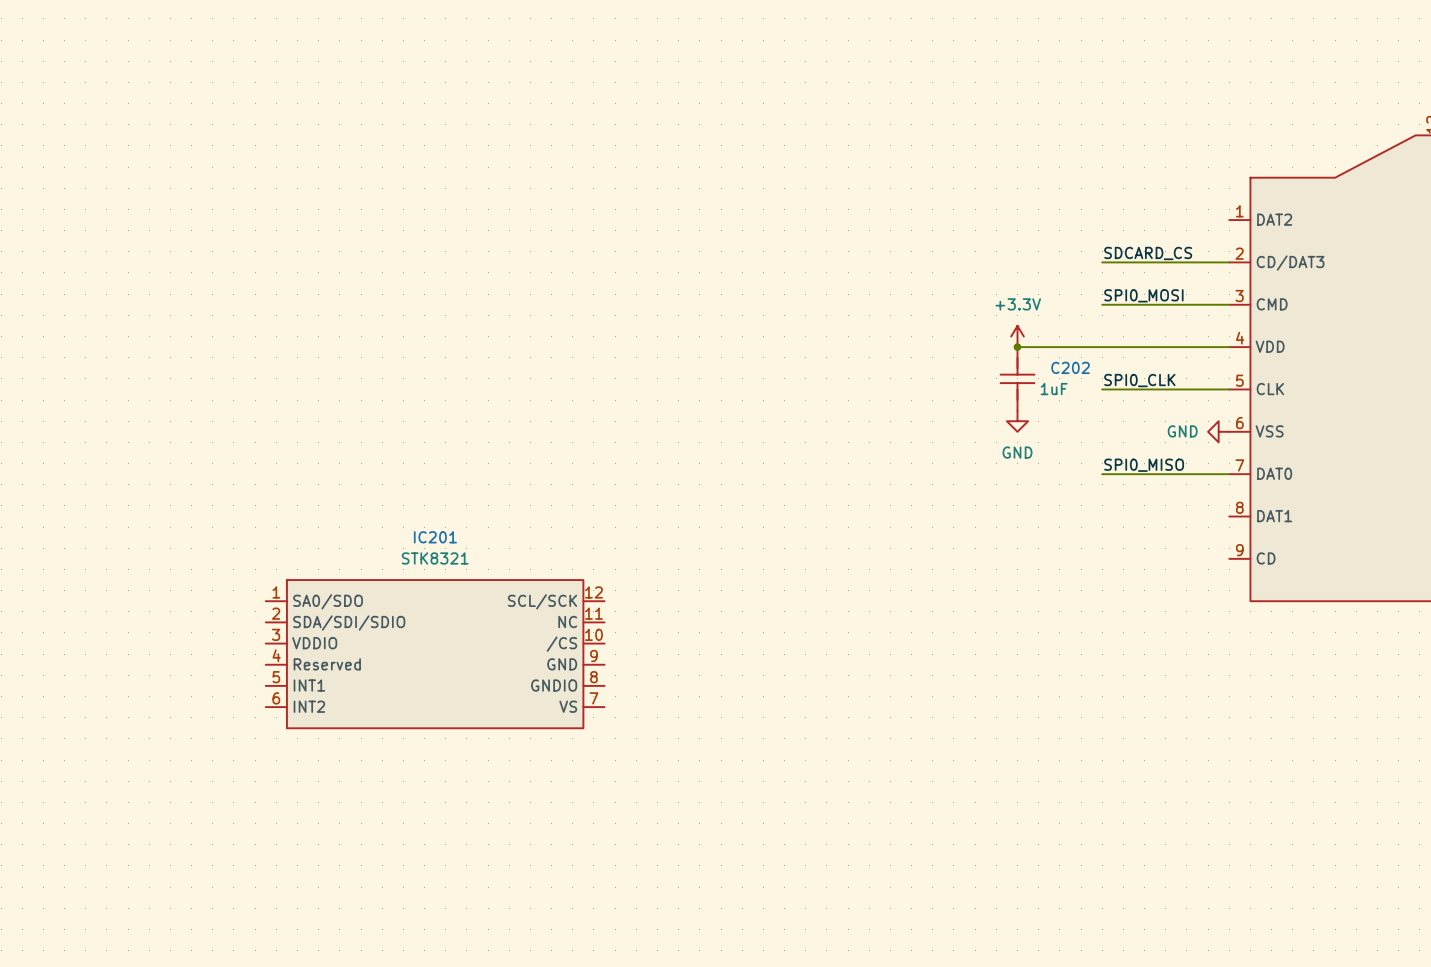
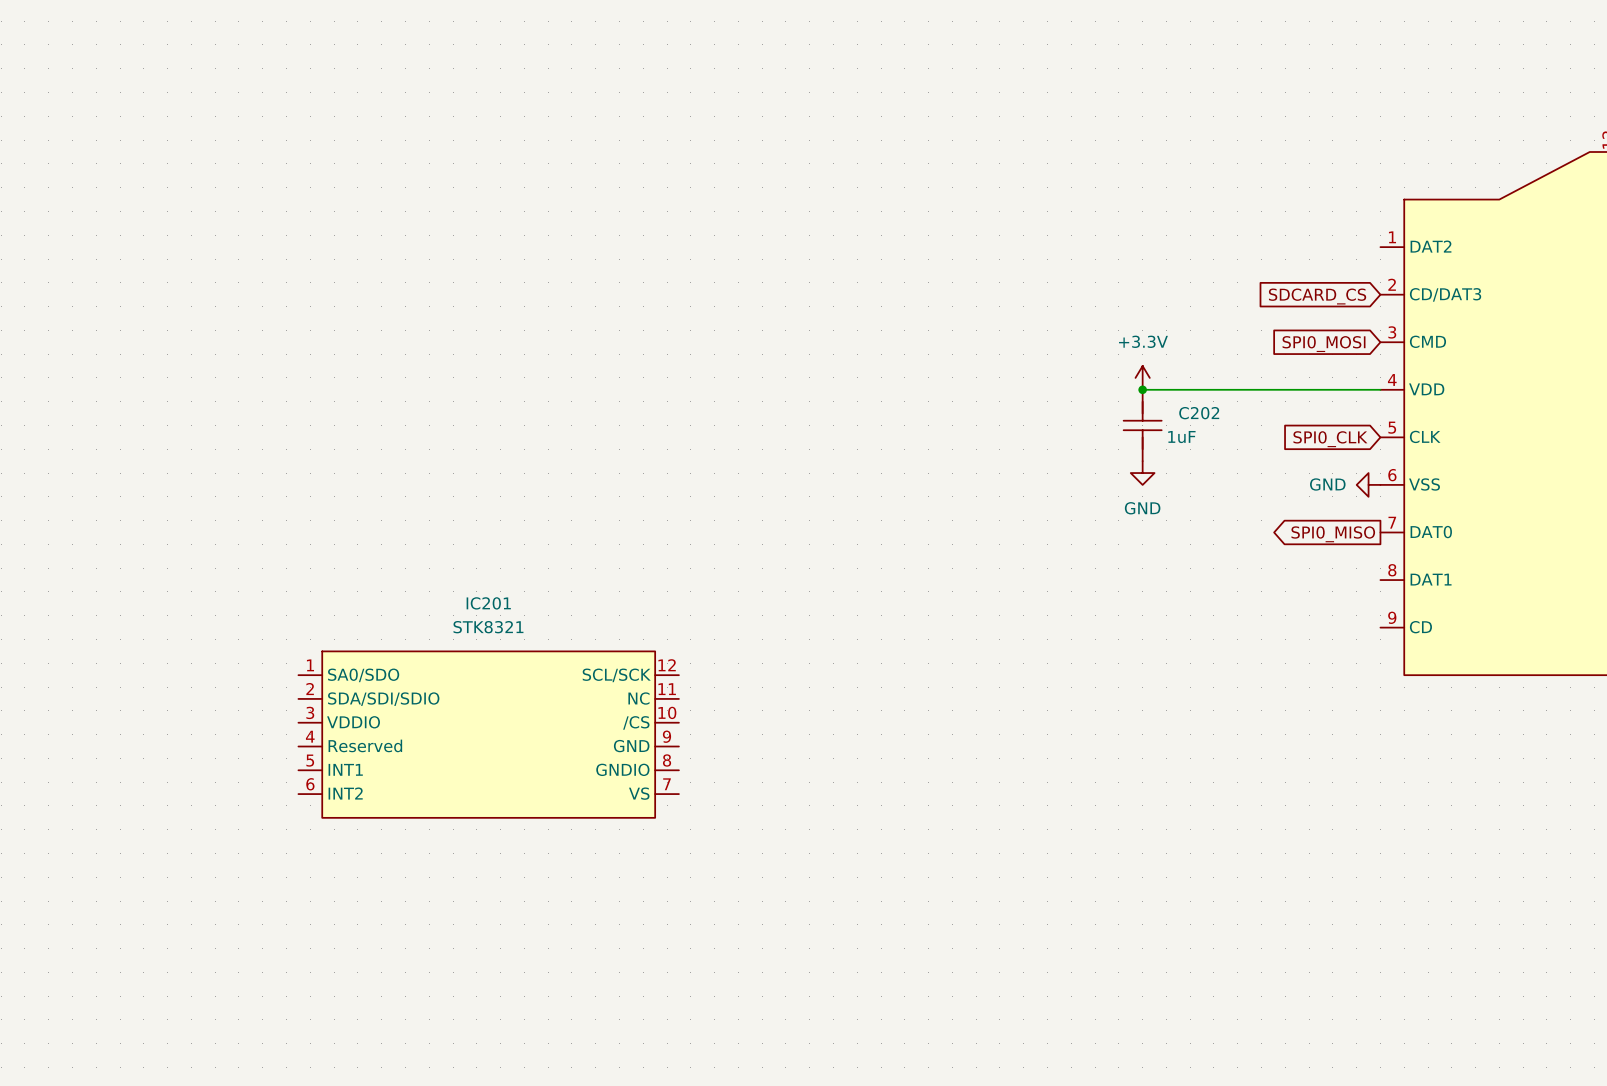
label: SDCARD_CS (1148, 253) -> none
wire: (1102, 262) (1229, 262) -> none
global label: none -> SDCARD_CS (1317, 296)
label: SPI0_MOSI (1143, 295) -> none
wire: (1102, 304) (1229, 304) -> none
global label: none -> SPI0_MOSI (1324, 344)
label: SPI0_CLK (1139, 380) -> none
wire: (1102, 389) (1229, 389) -> none
global label: none -> SPI0_CLK (1330, 439)
label: SPI0_MISO (1144, 465) -> none
wire: (1102, 474) (1229, 474) -> none
global label: none -> SPI0_MISO (1333, 534)

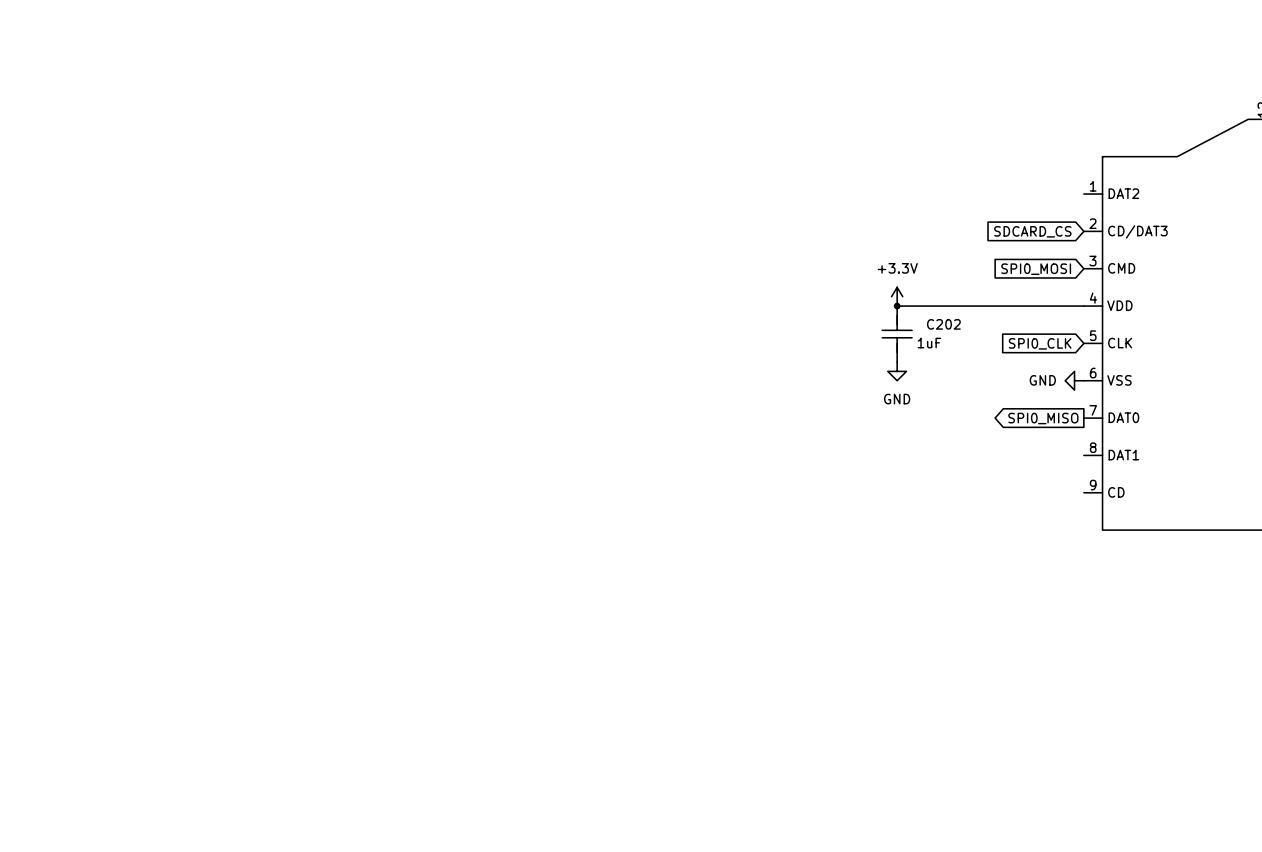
IC201: STK8321 (488, 734) -> none

